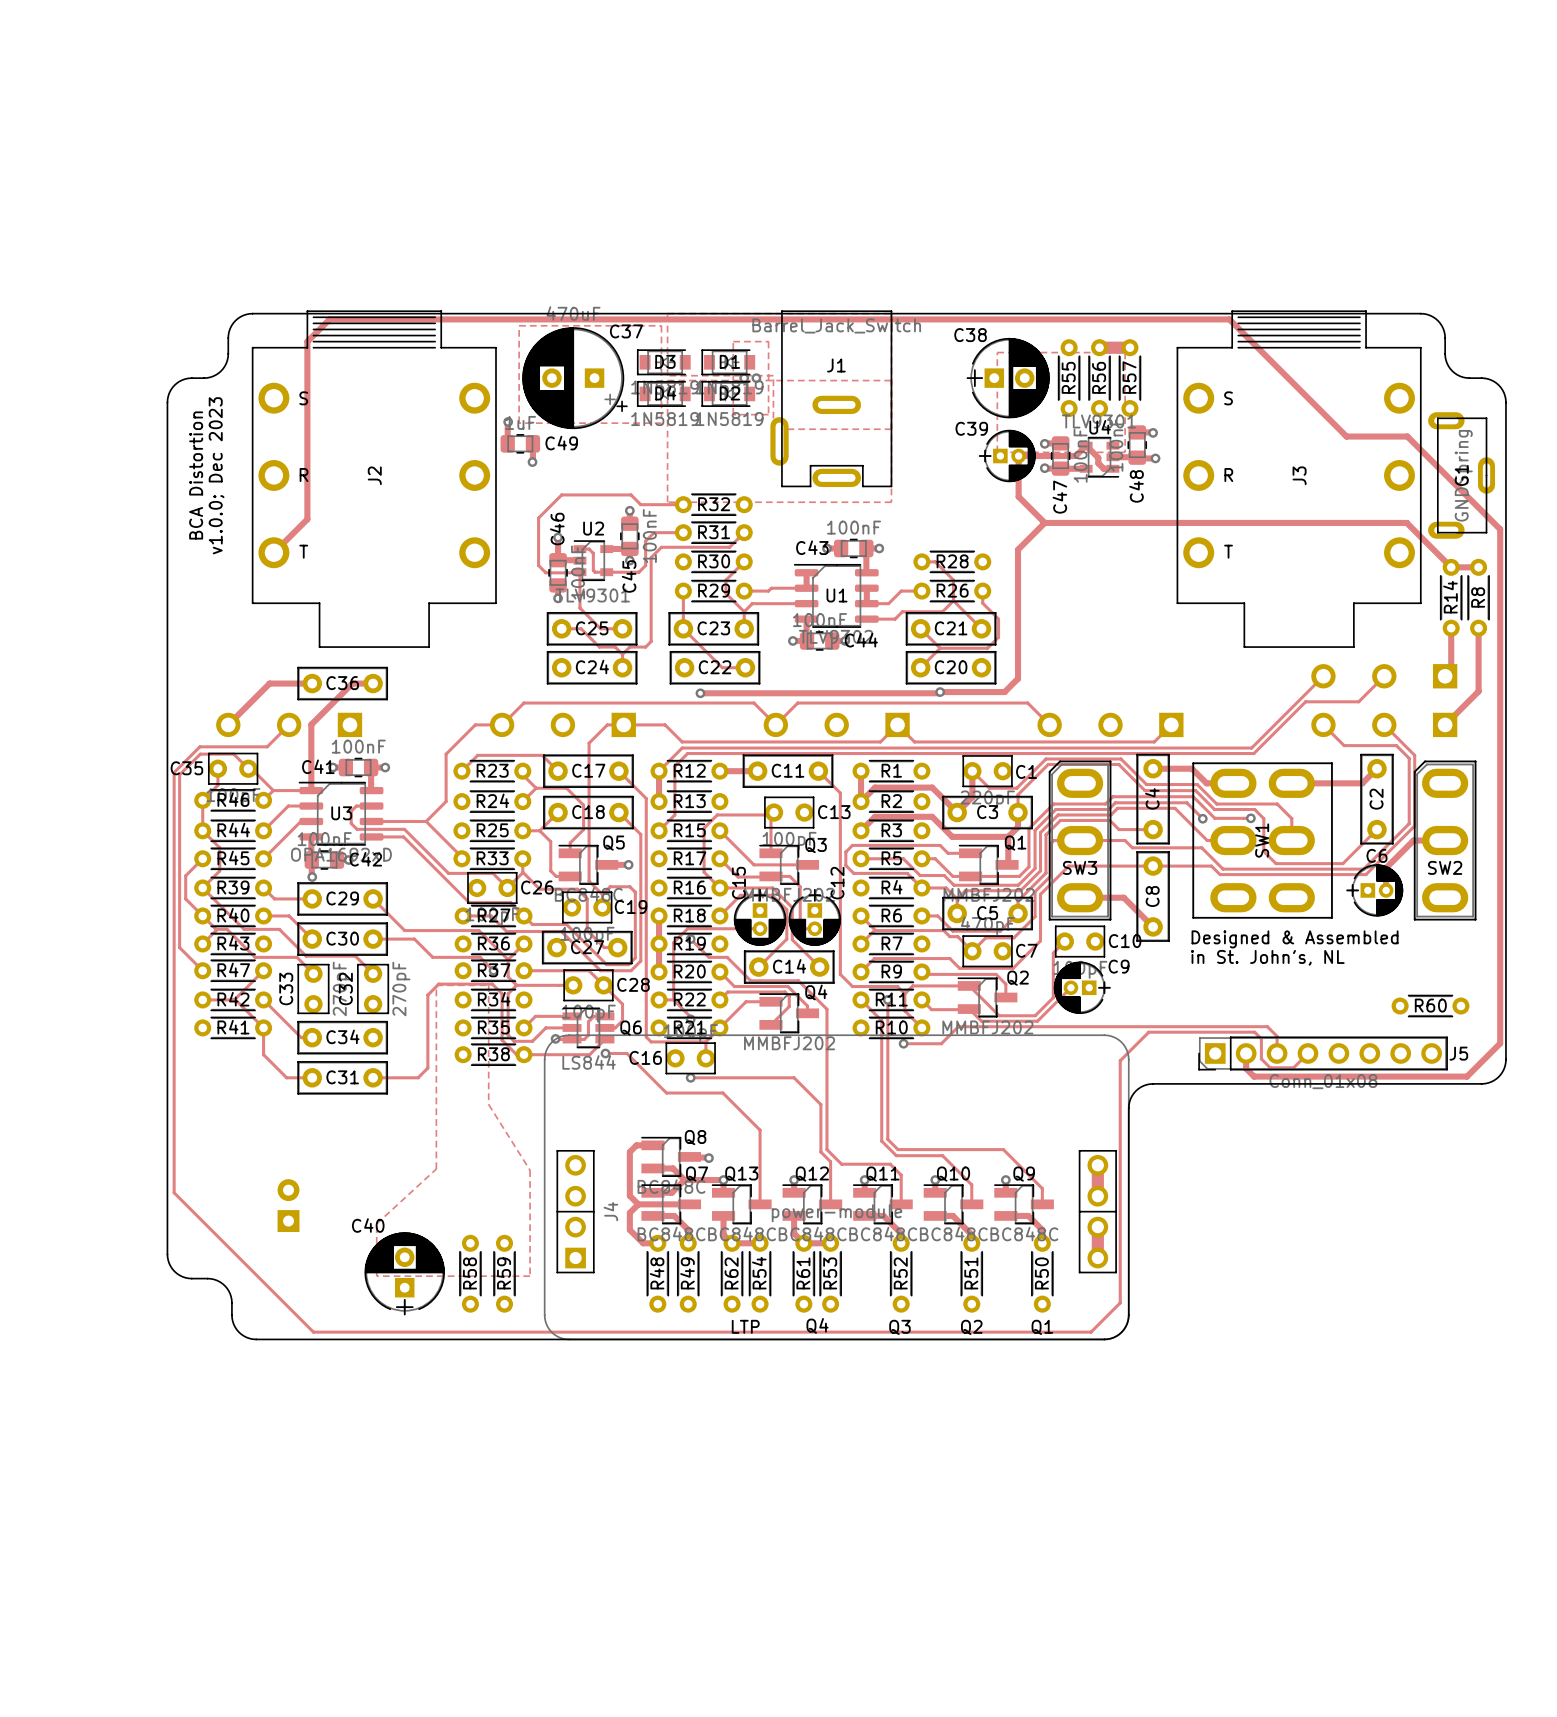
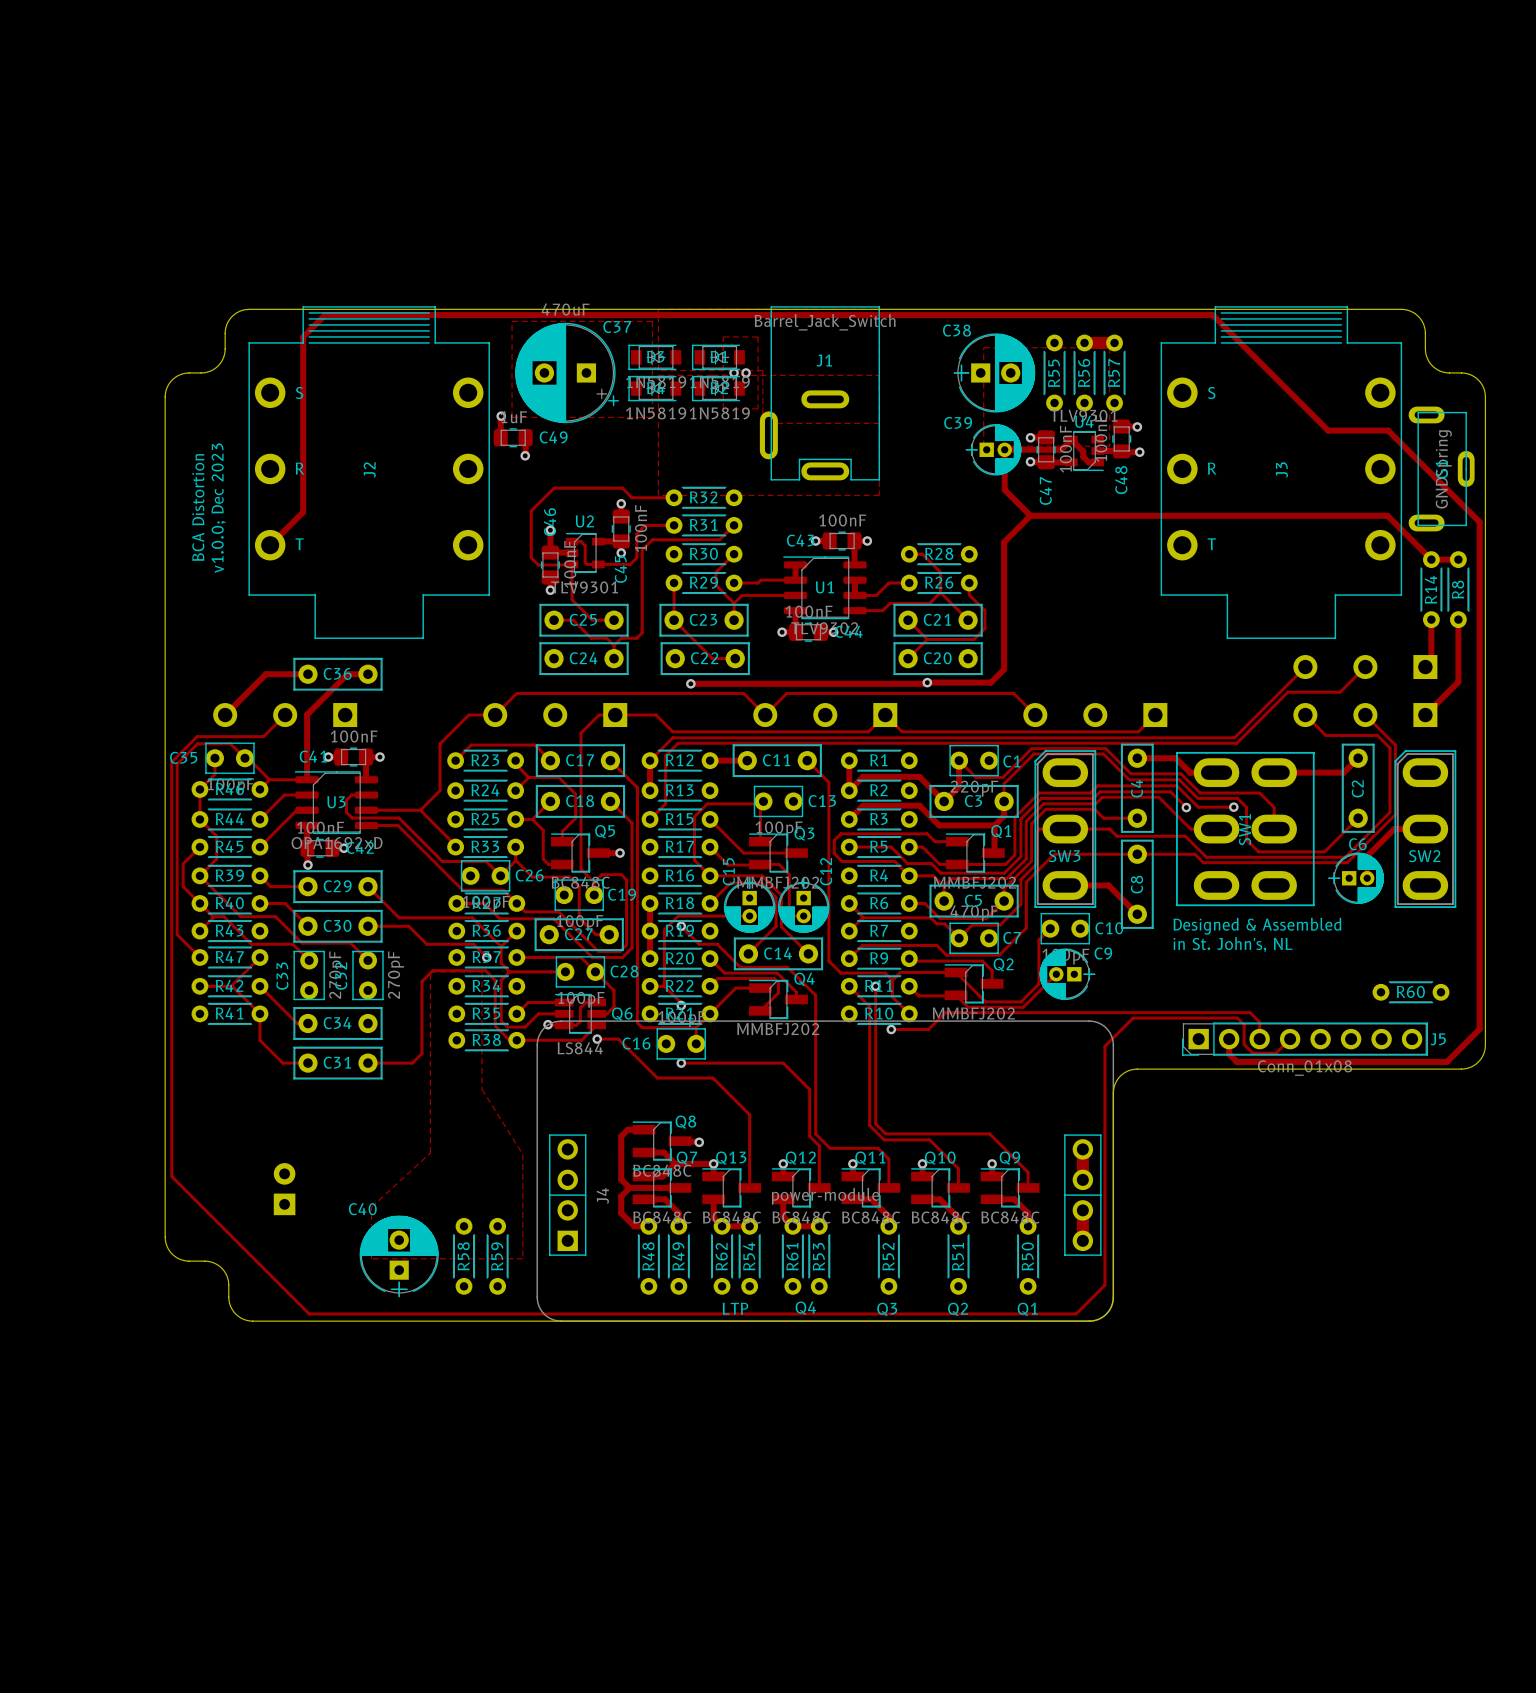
text position: BCA Distortion (196, 475) -> BCA Distortion (198, 507)
text position: v1.0.0; Dec 2023 (216, 475) -> v1.0.0; Dec 2023 (218, 508)

